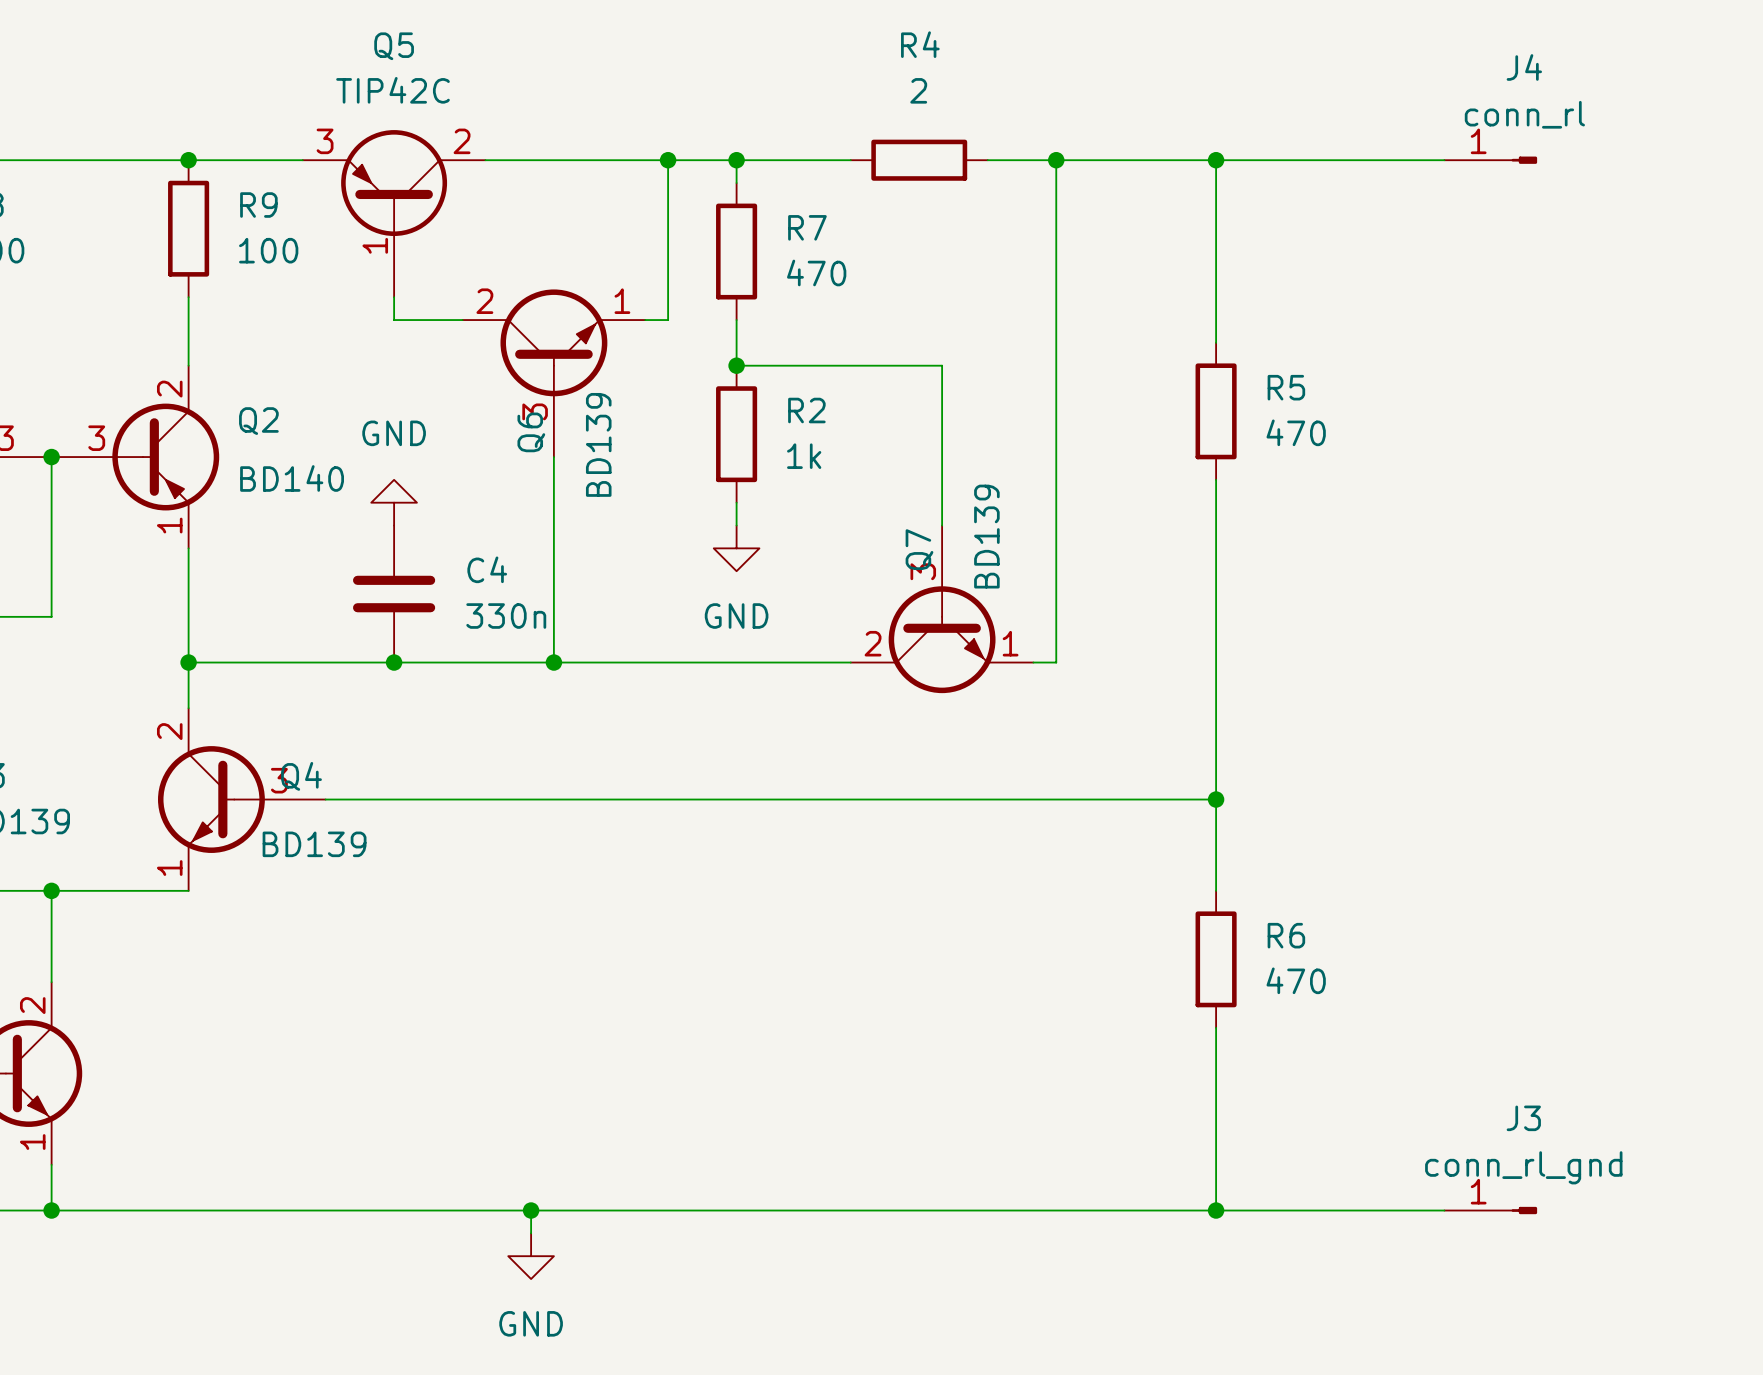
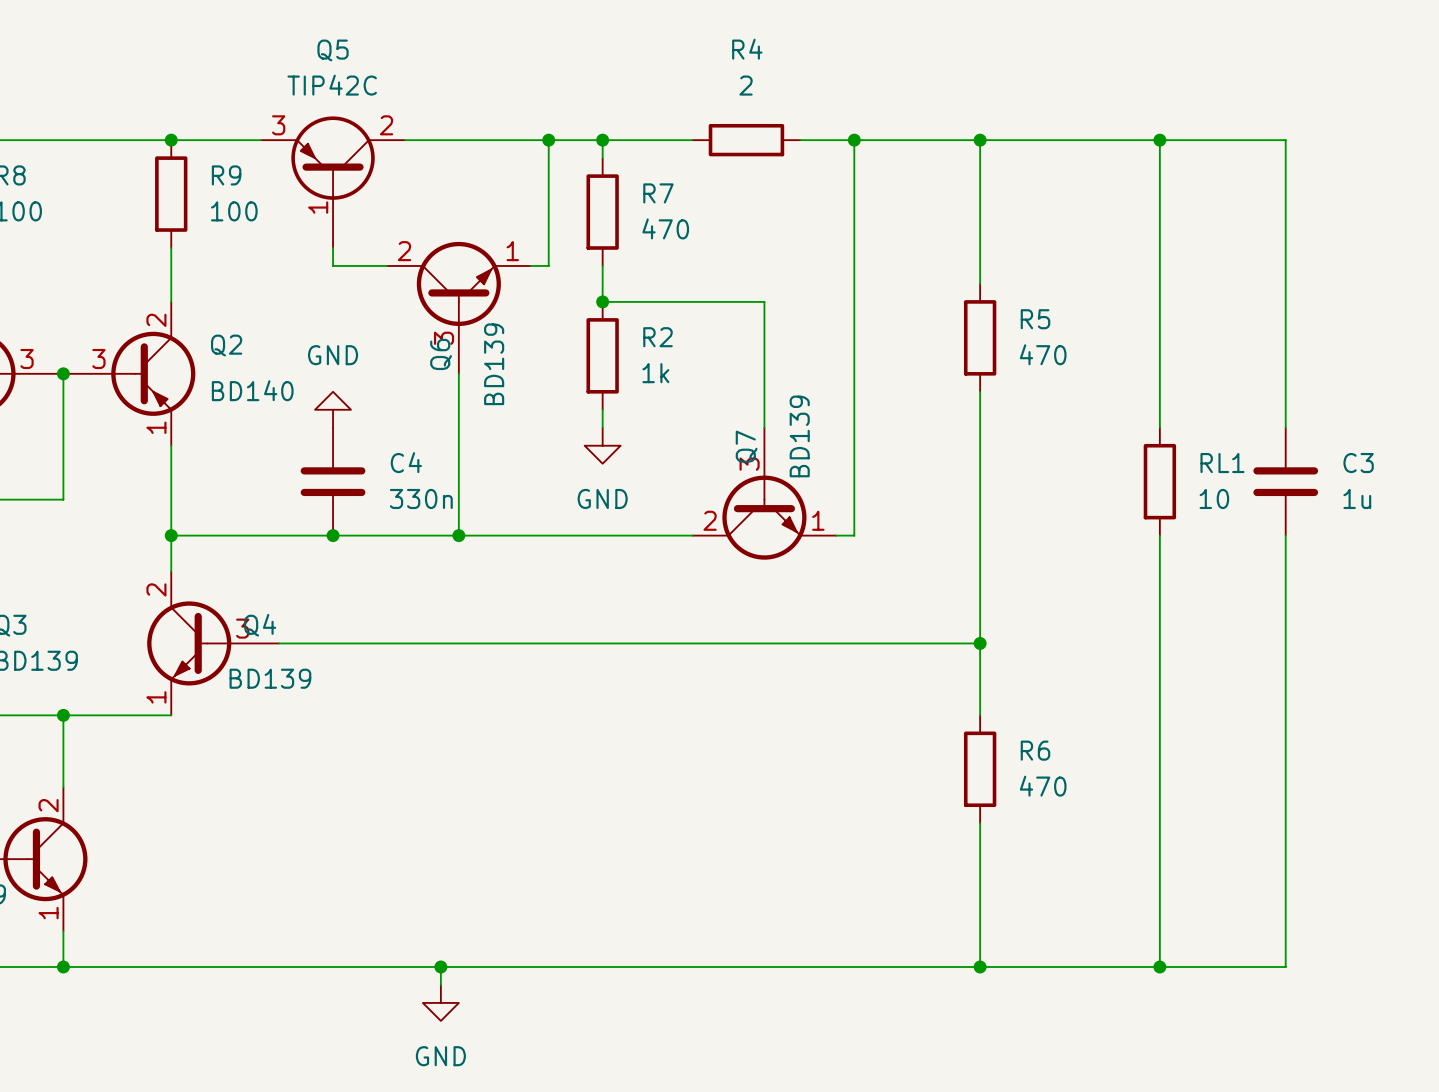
junction: none -> (1159, 140)
J4: conn_rl (1490, 160) -> none
wire: none -> (1159, 427) (1159, 140) (1285, 140) (1285, 427)
RL1: none -> 10 (1159, 481)
C3: none -> 1u (1285, 481)
wire: none -> (1159, 535) (1159, 967) (1285, 967) (1285, 535)
junction: none -> (1159, 967)
J3: conn_rl_gnd (1490, 1210) -> none

